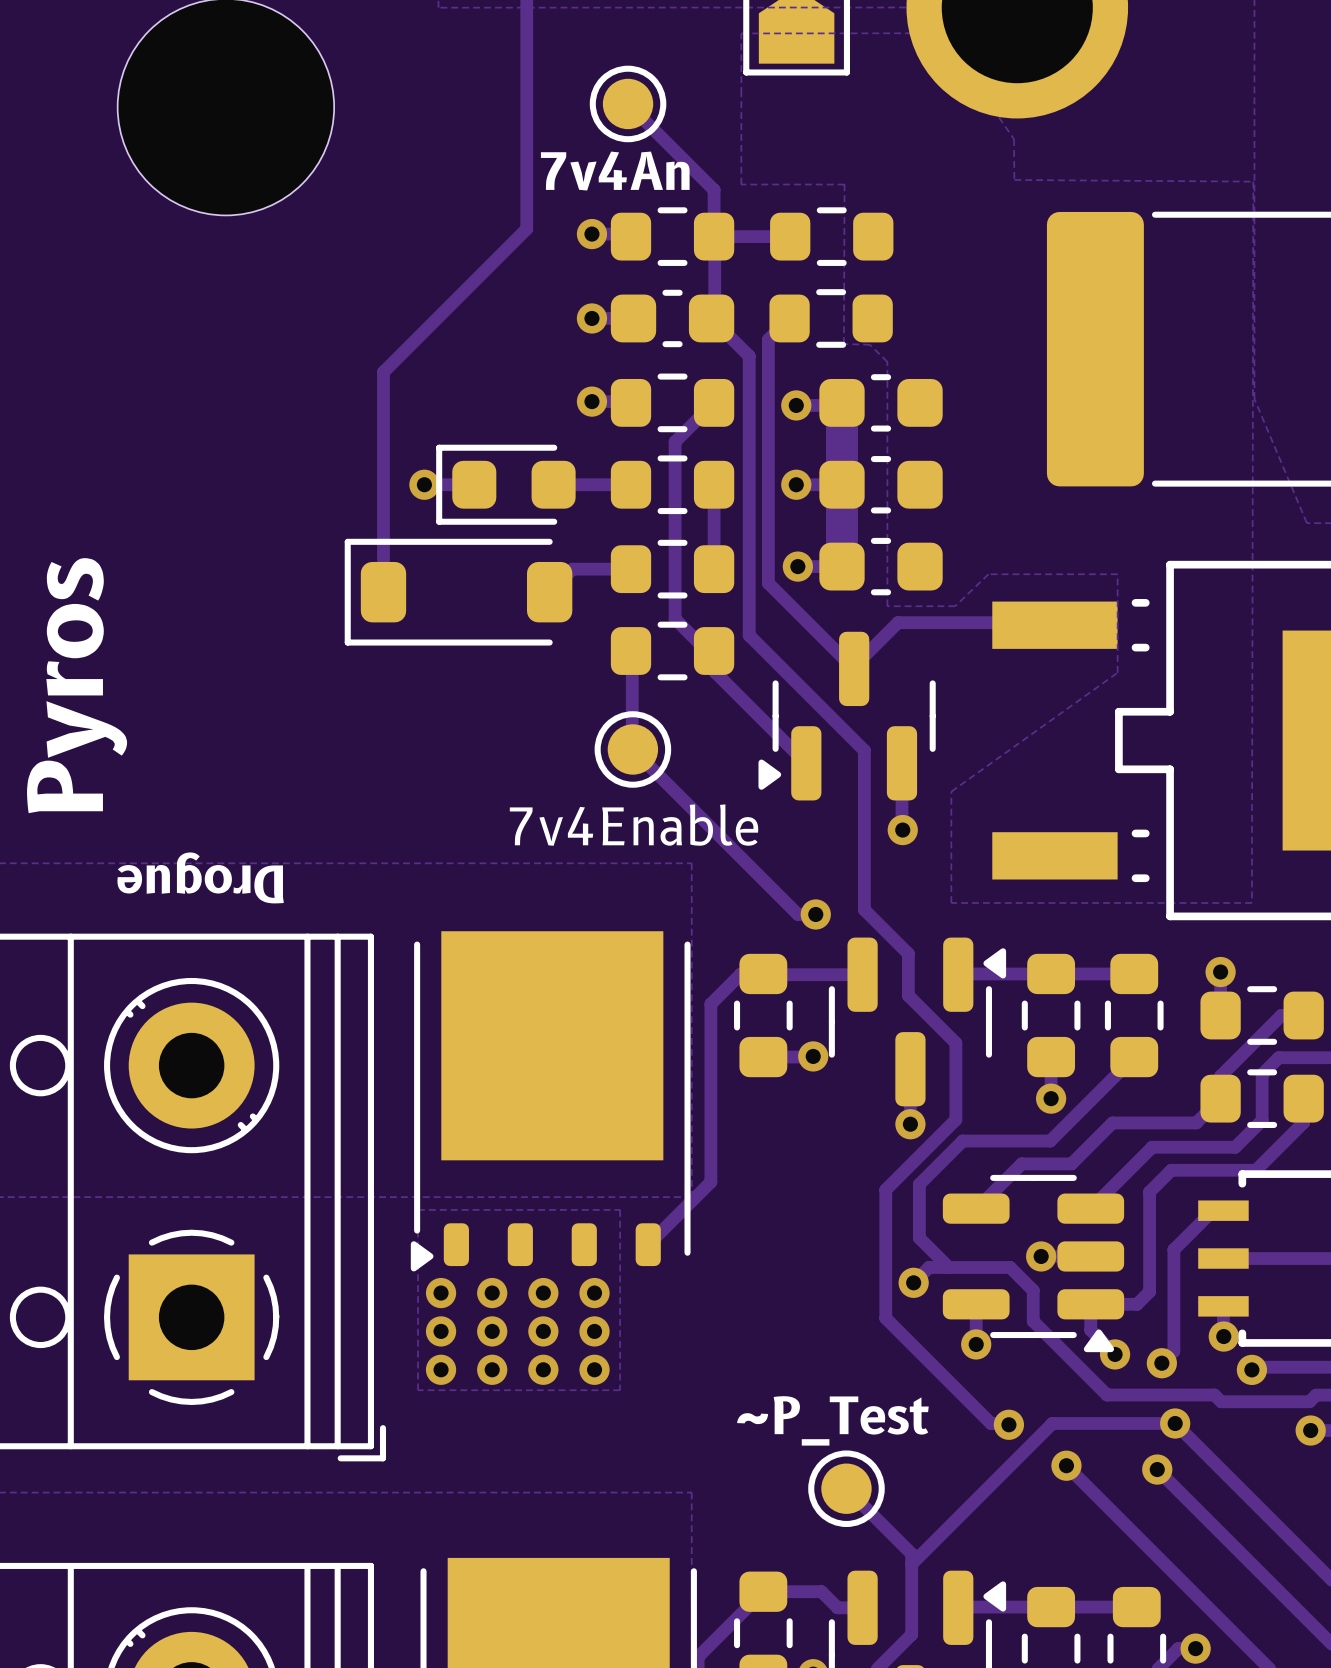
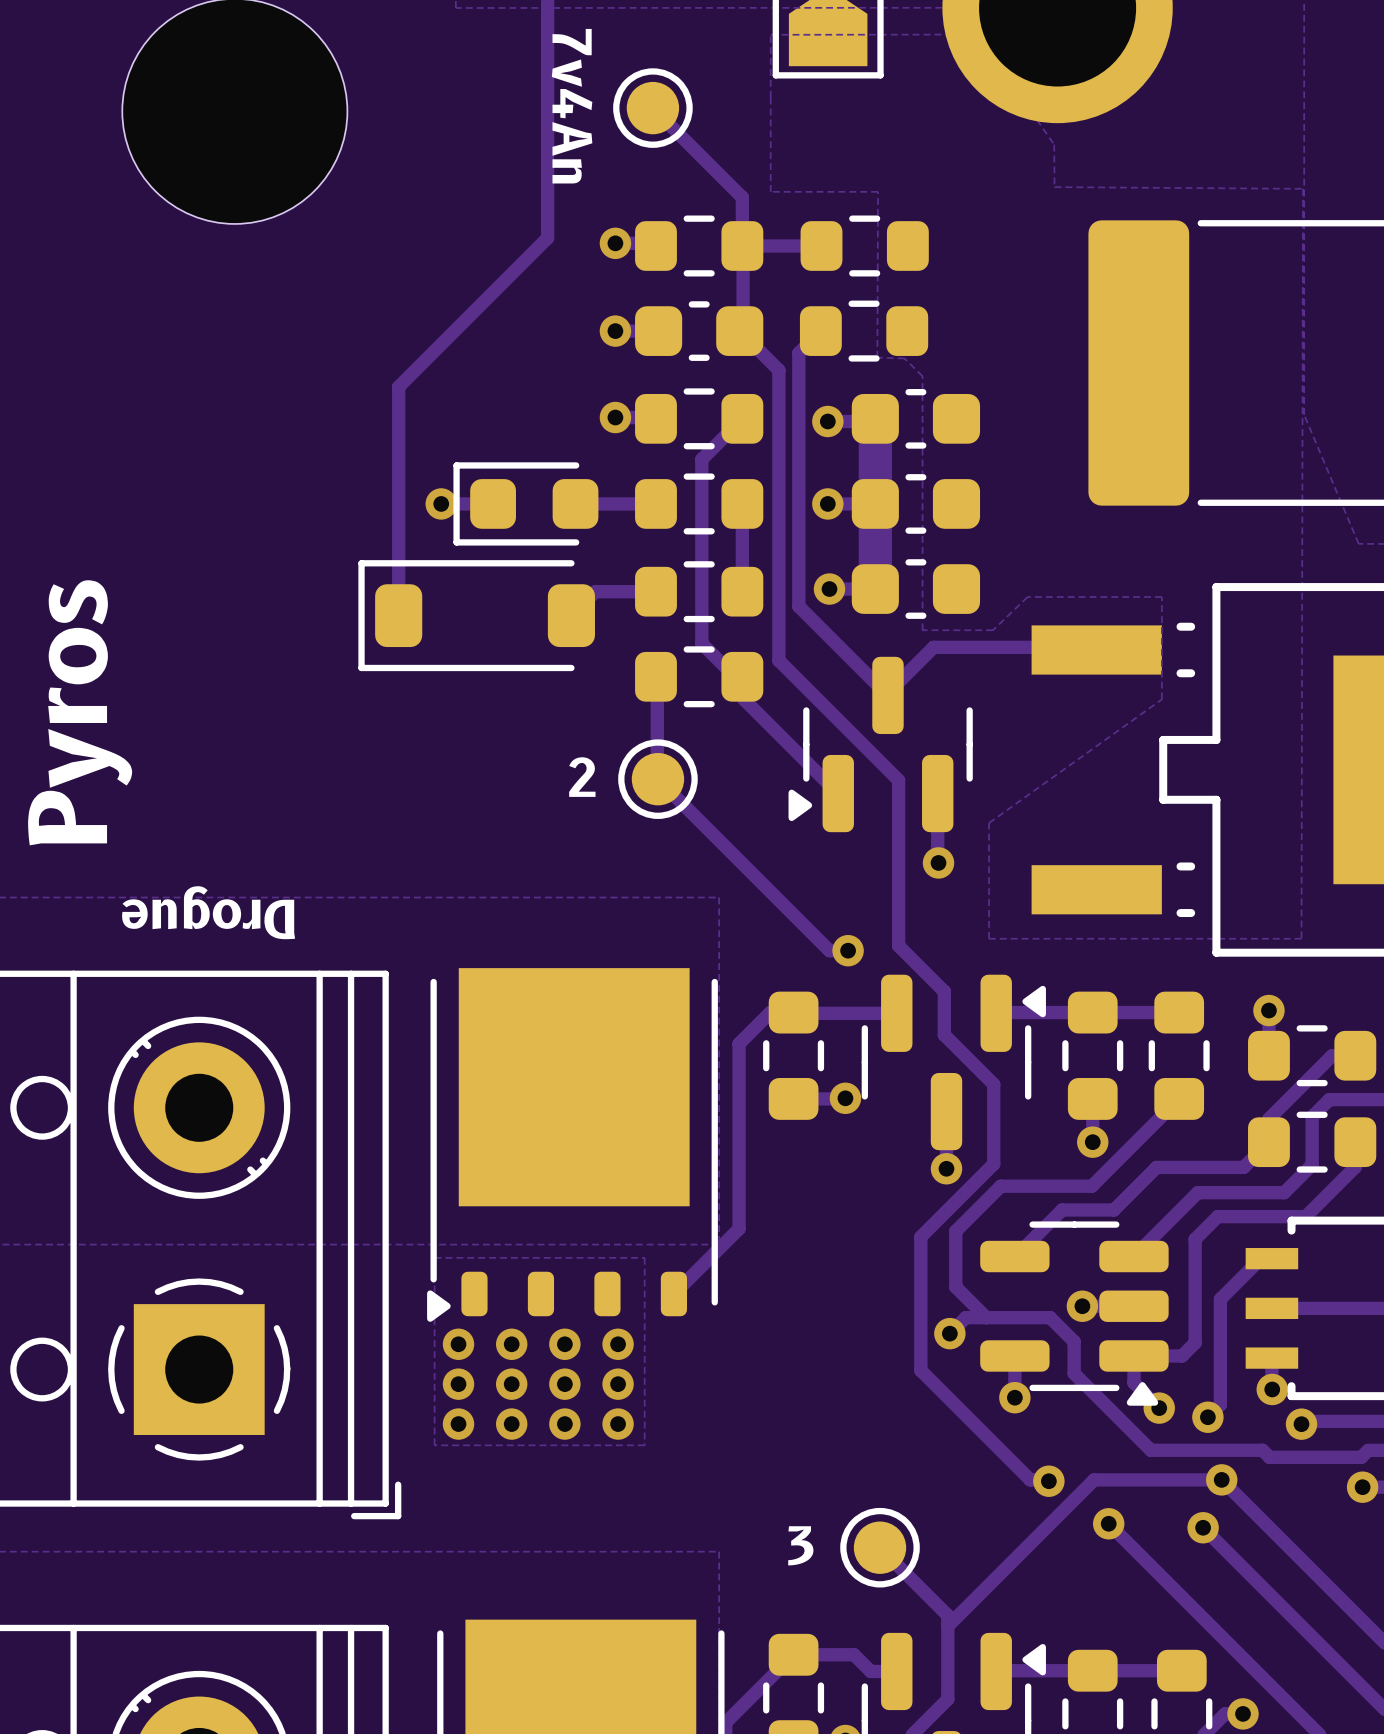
text rotation: 0° (615, 171) -> 90° clockwise (572, 106)
text: none -> 2 (582, 777)
part value: 7v4Enable (634, 825) -> none
text: ~P_Test (832, 1420) -> none
text: none -> 3 (800, 1545)

